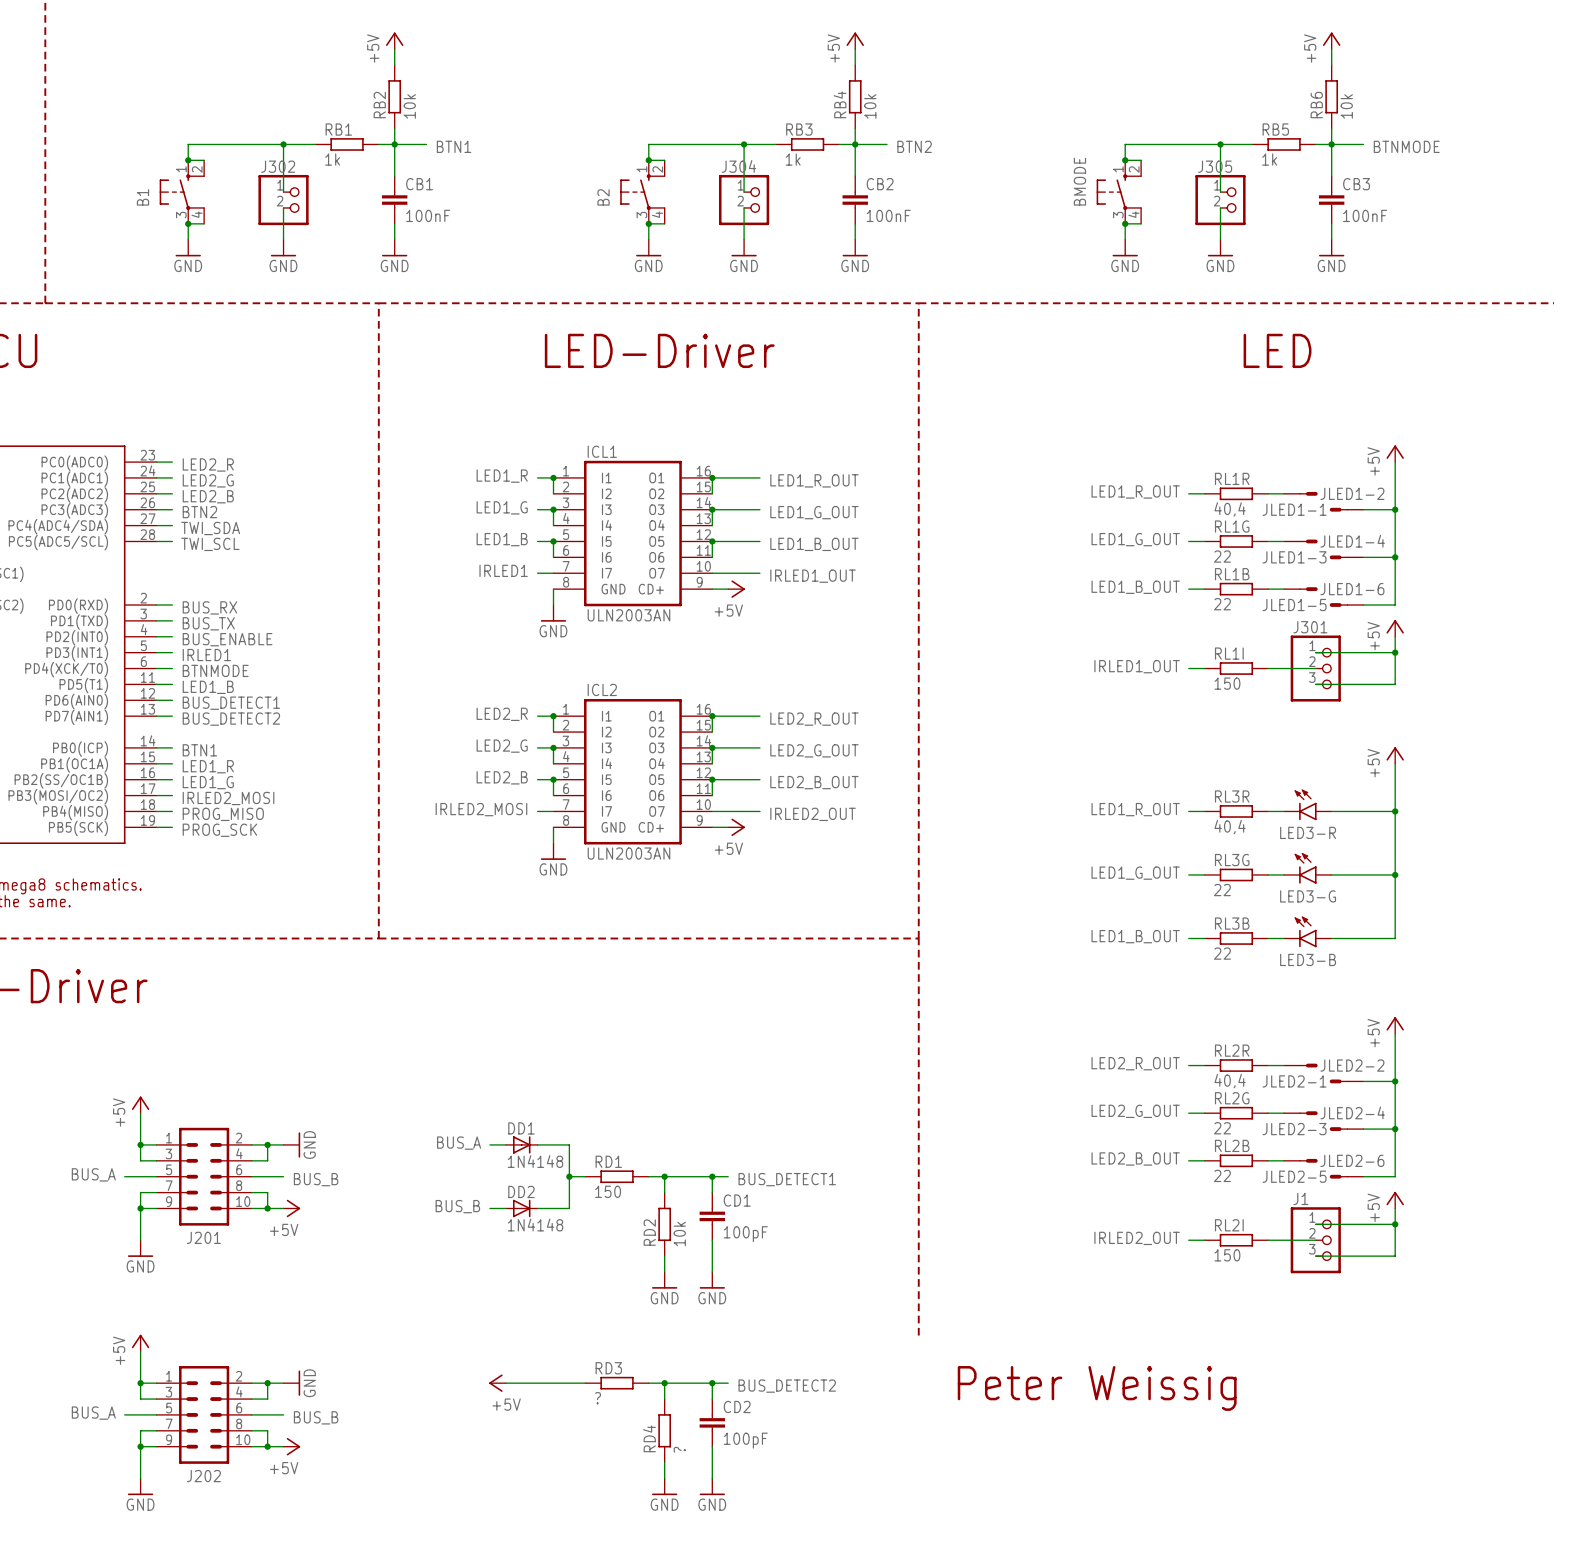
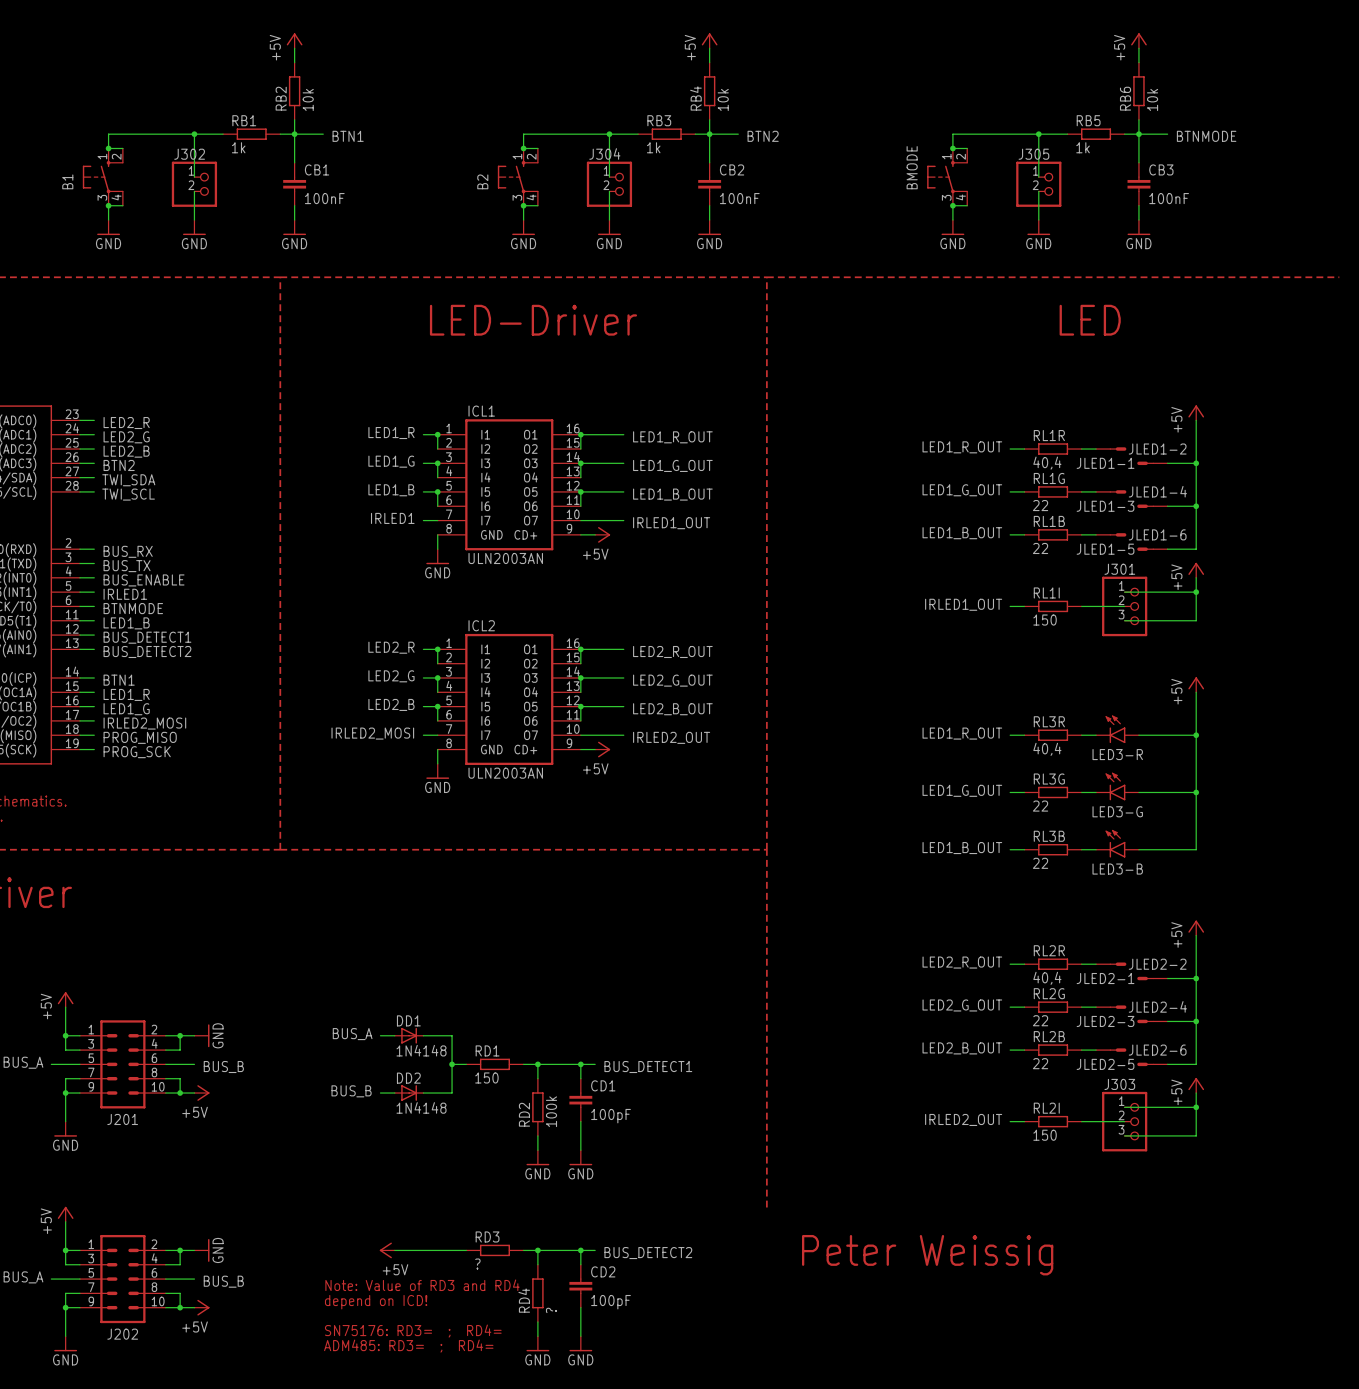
J1 name: J1 (1300, 1198) -> J303 (1119, 1084)
RD2 value: 10k (679, 1234) -> 100k (551, 1111)
text: none -> Note: Value of RD3 and RD4 (422, 1285)
text: none -> depend on ICD! (376, 1302)
text: none -> SN75176: RD3= ; RD4= (413, 1331)
text: none -> ADM485: RD3= ; RD4= (408, 1346)

